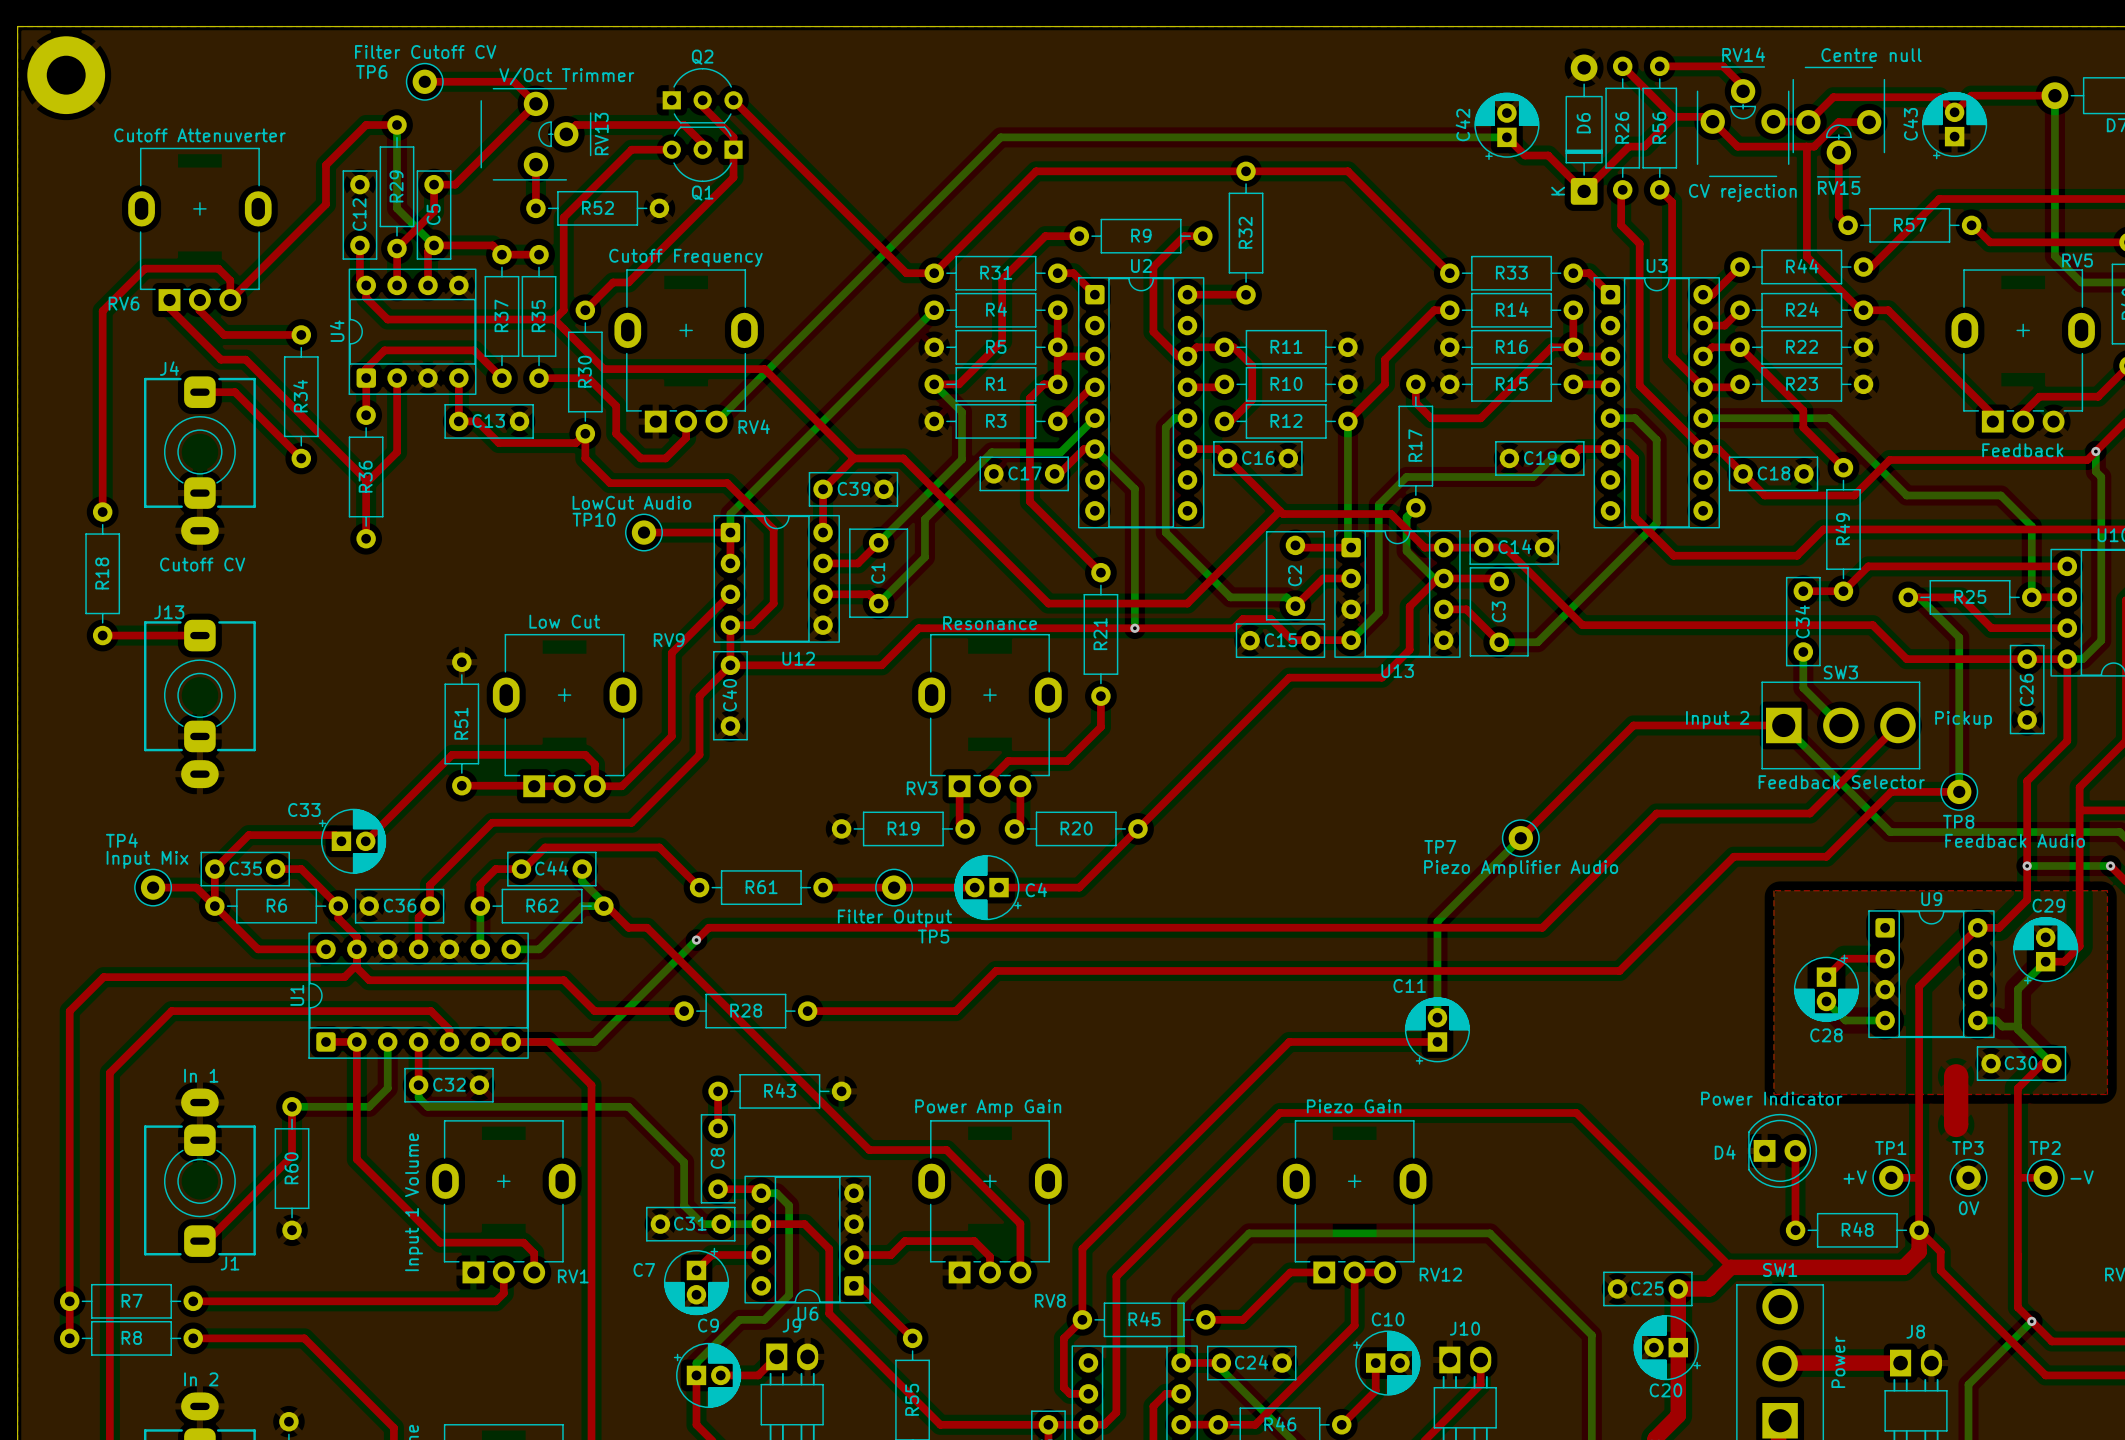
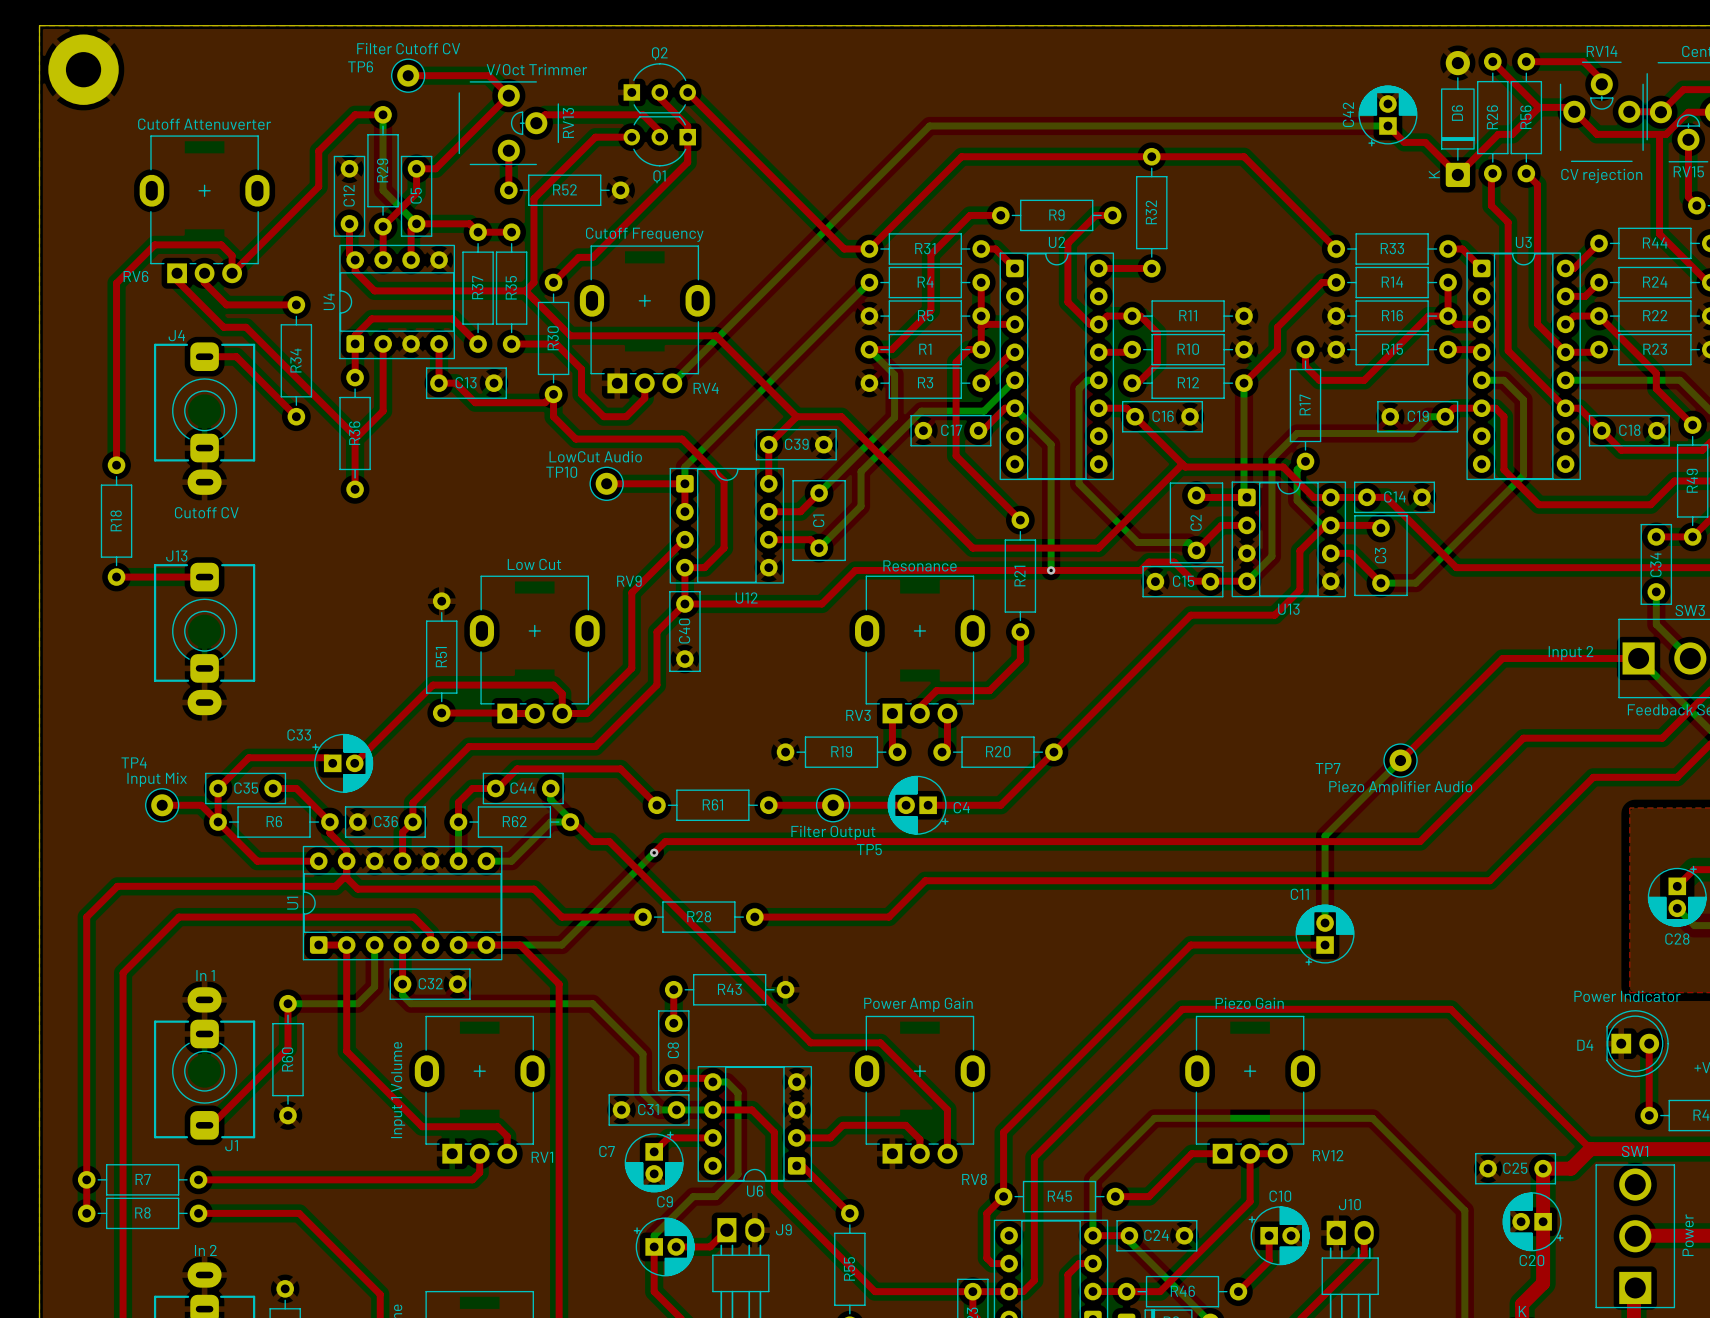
J9 name position: J9 (791, 1325) -> J9 (783, 1229)

